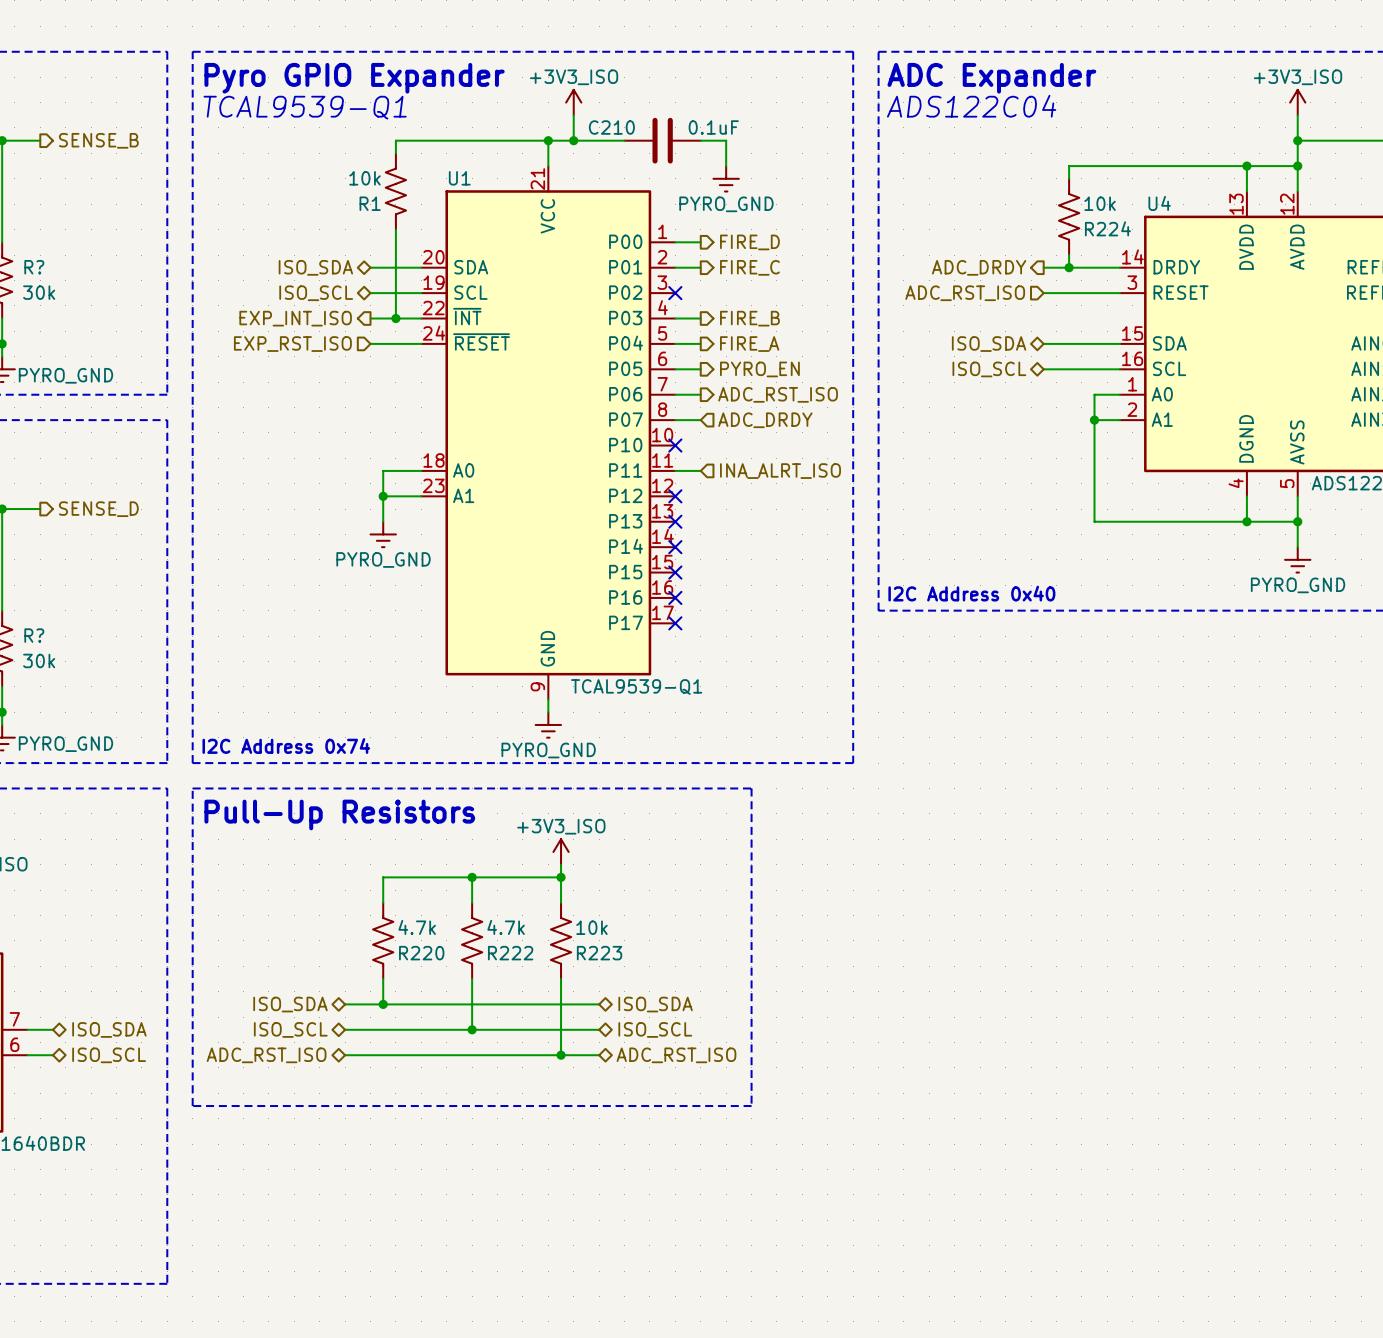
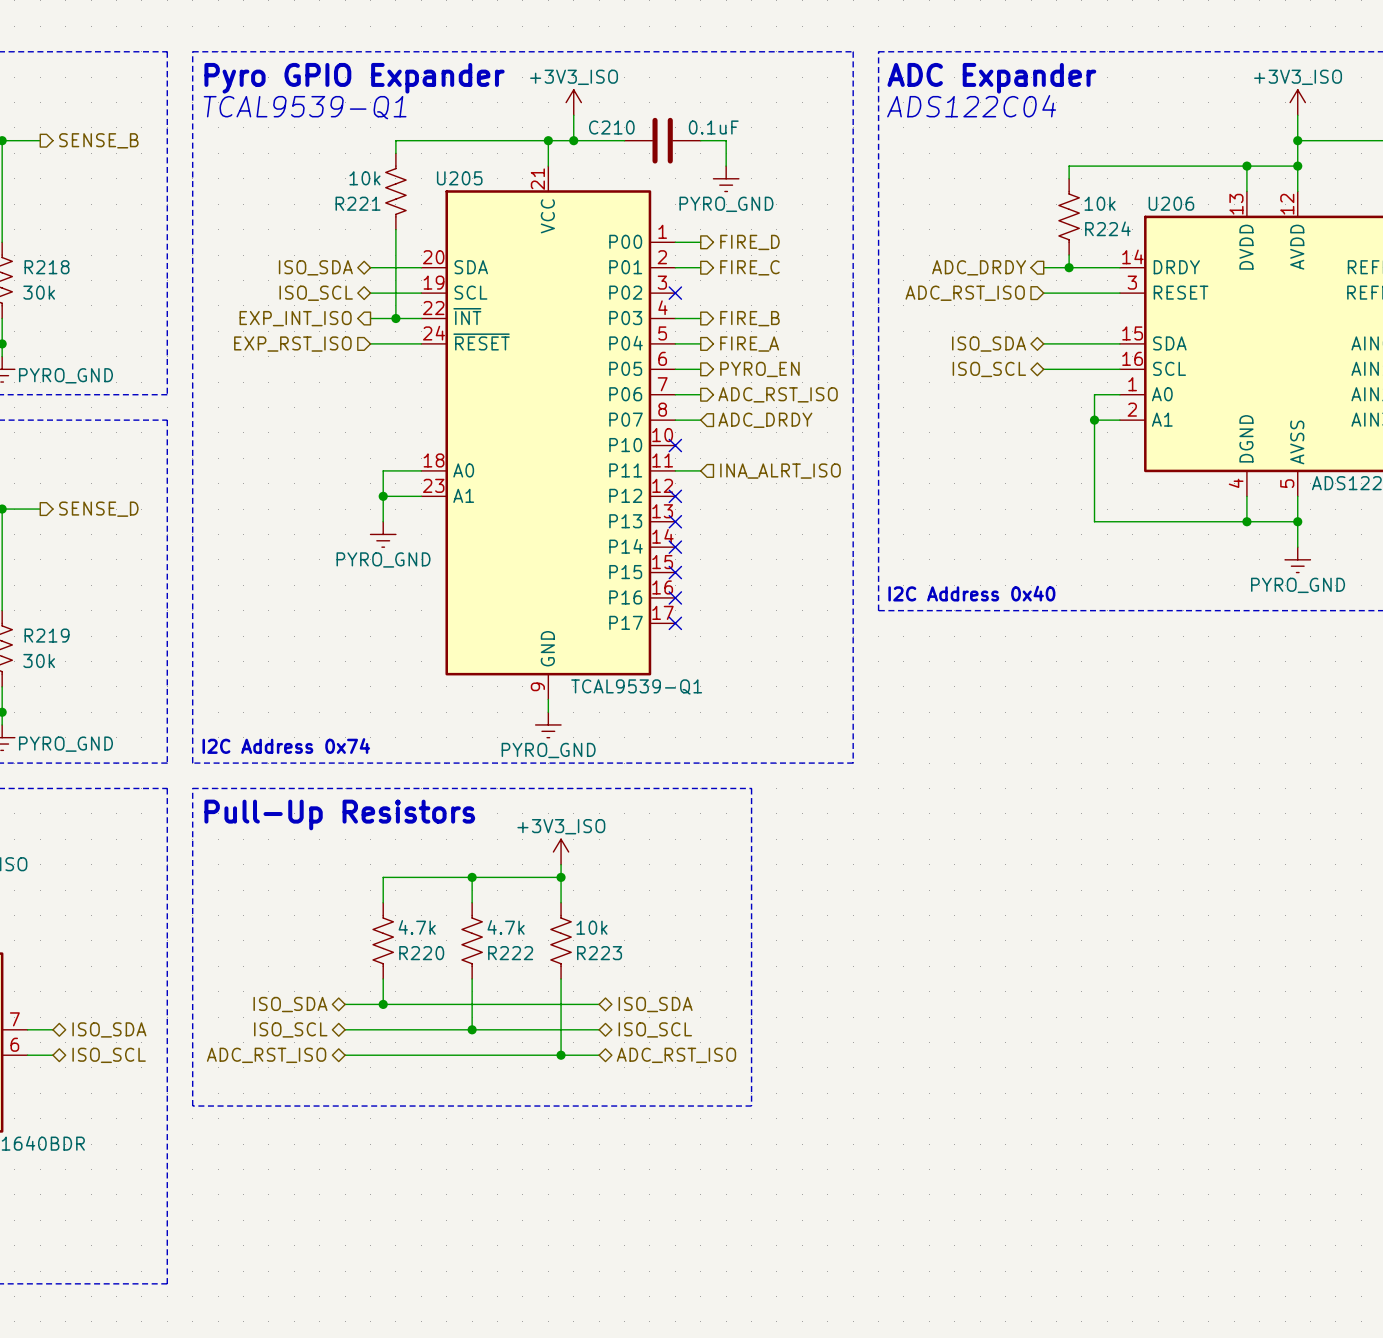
U1 name: U1 (459, 178) -> U205 (459, 178)
R1 name: R1 (370, 203) -> R221 (358, 203)
U4 name: U4 (1159, 203) -> U206 (1171, 203)
R? name: R? (34, 267) -> R218 (47, 267)
R? name: R? (34, 635) -> R219 (47, 635)

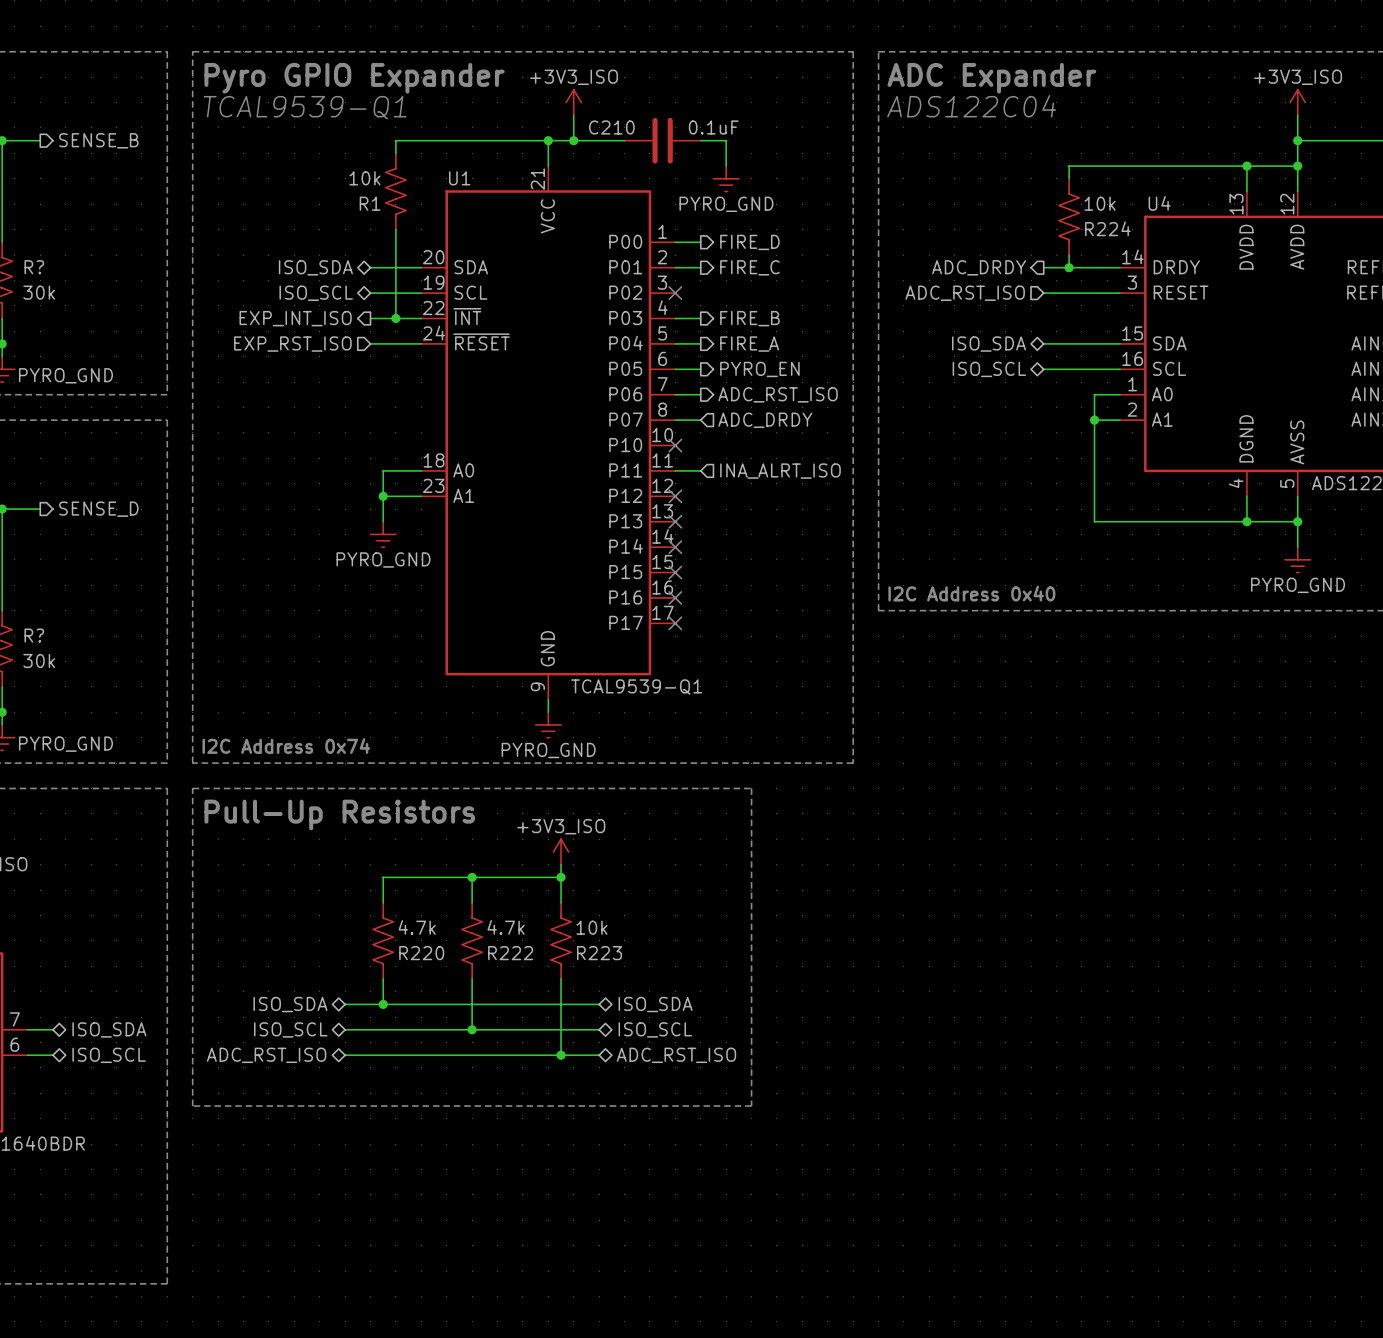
U205 name: U205 (459, 178) -> U1 (459, 178)
R221 name: R221 (358, 203) -> R1 (370, 203)
U206 name: U206 (1171, 203) -> U4 (1159, 203)
R218 name: R218 (47, 267) -> R? (34, 267)
R219 name: R219 (47, 635) -> R? (34, 635)

